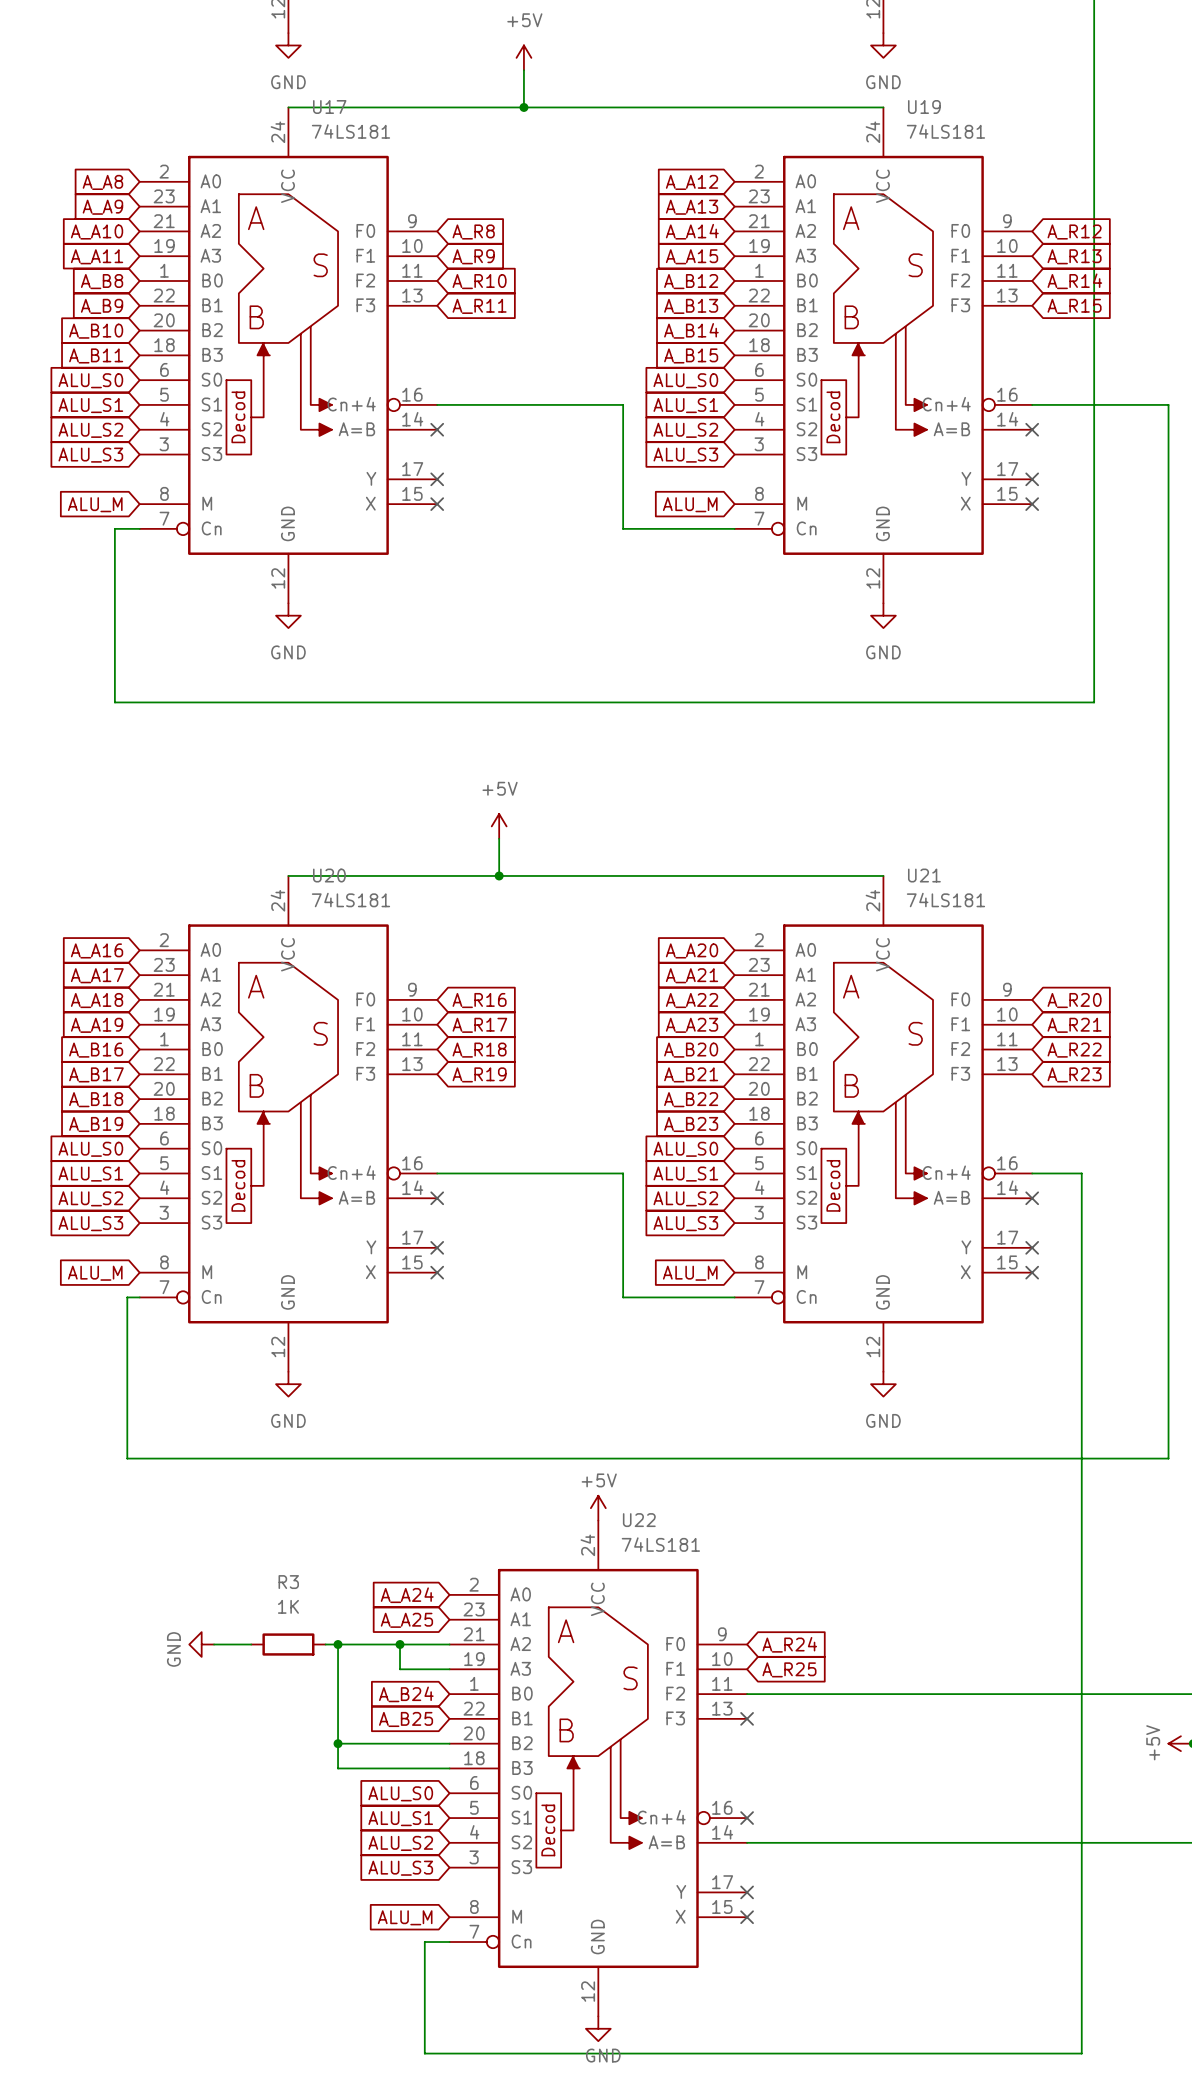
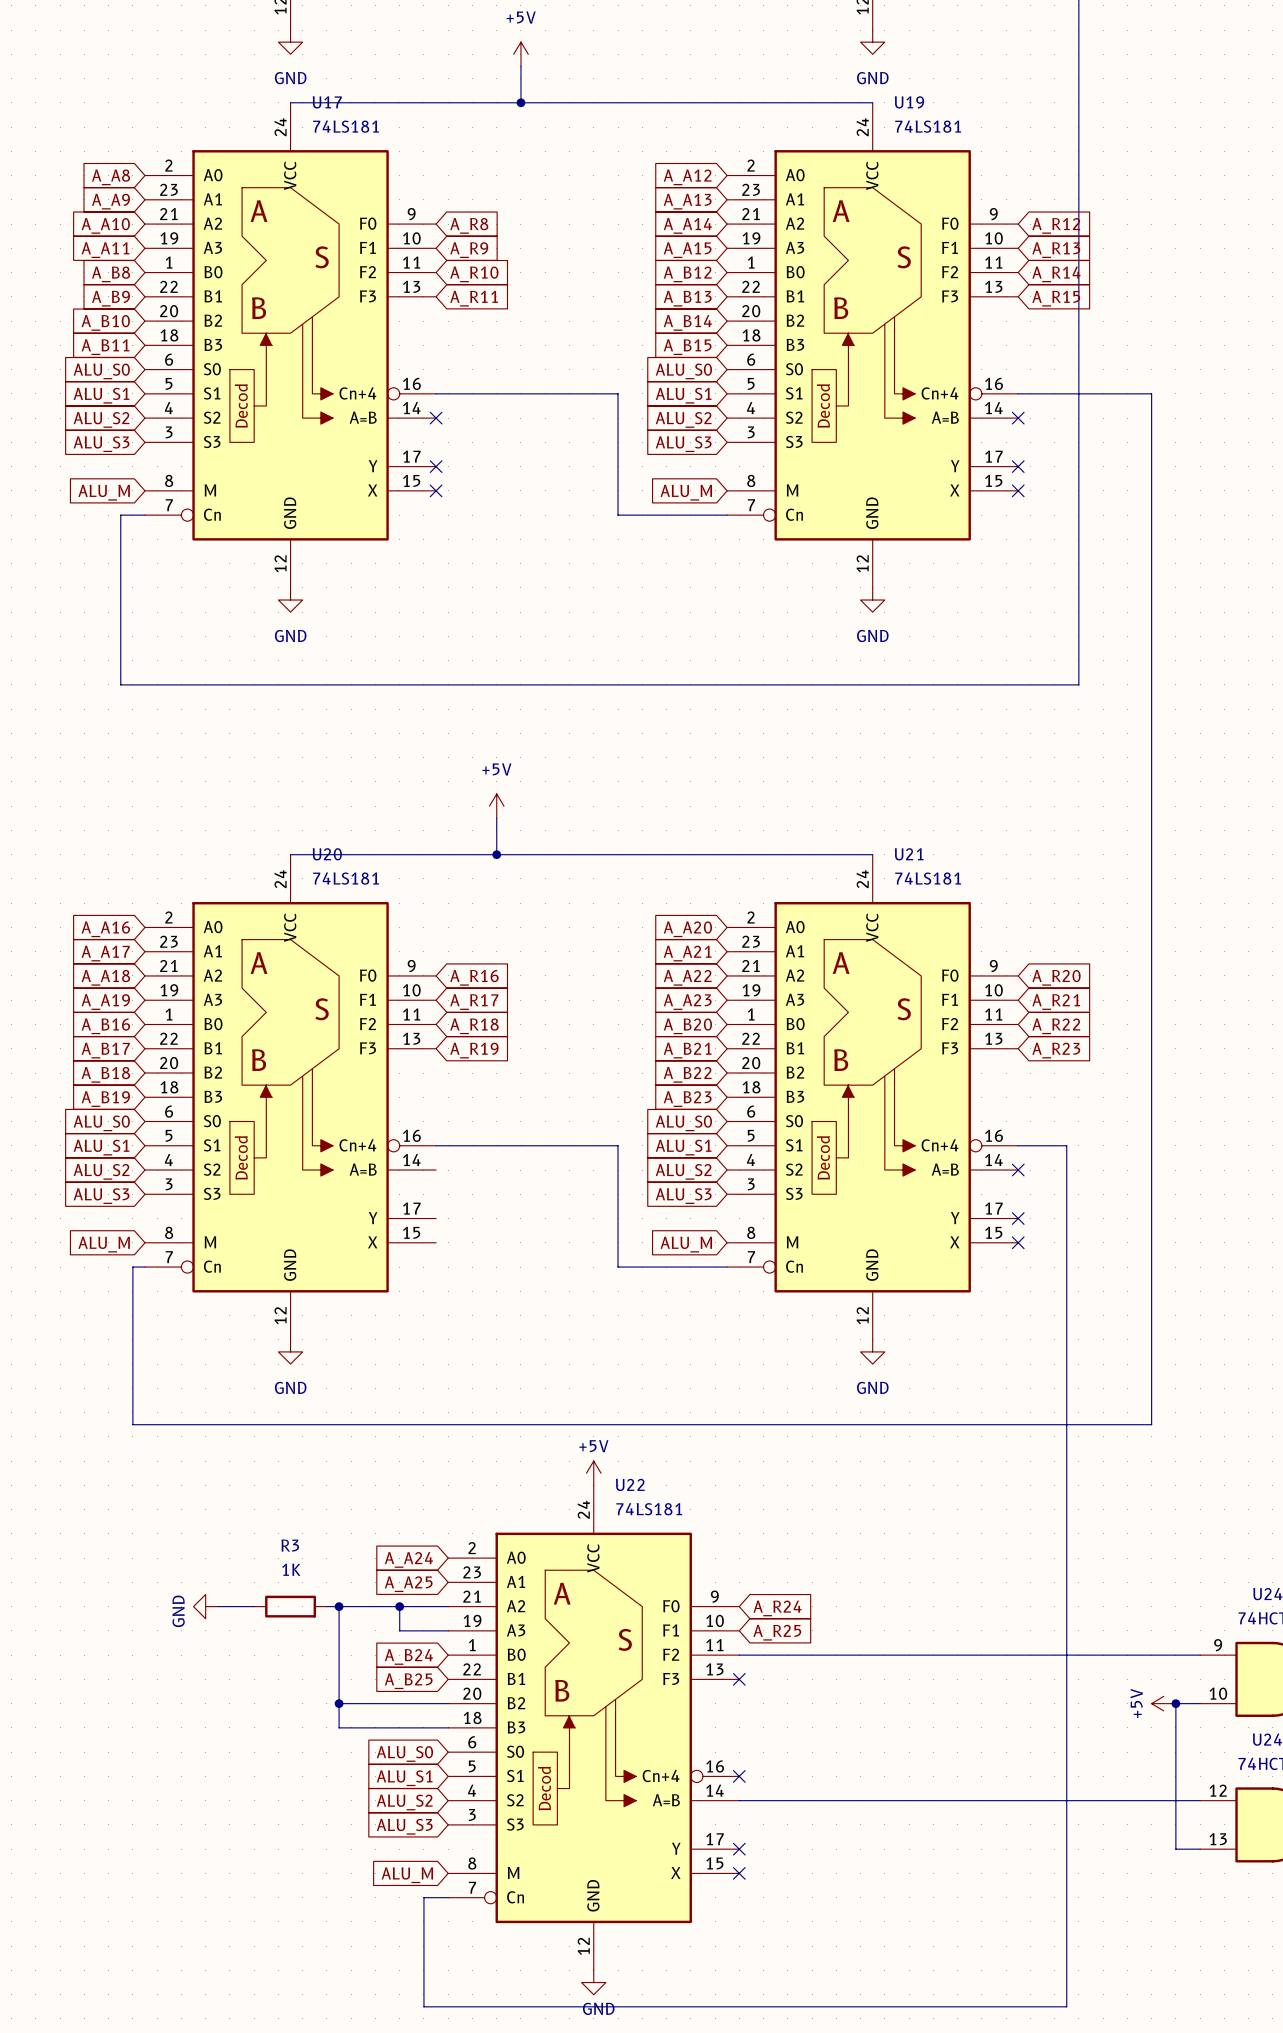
no-connect mark: (437, 1198) -> none
no-connect mark: (437, 1247) -> none
no-connect mark: (437, 1272) -> none

